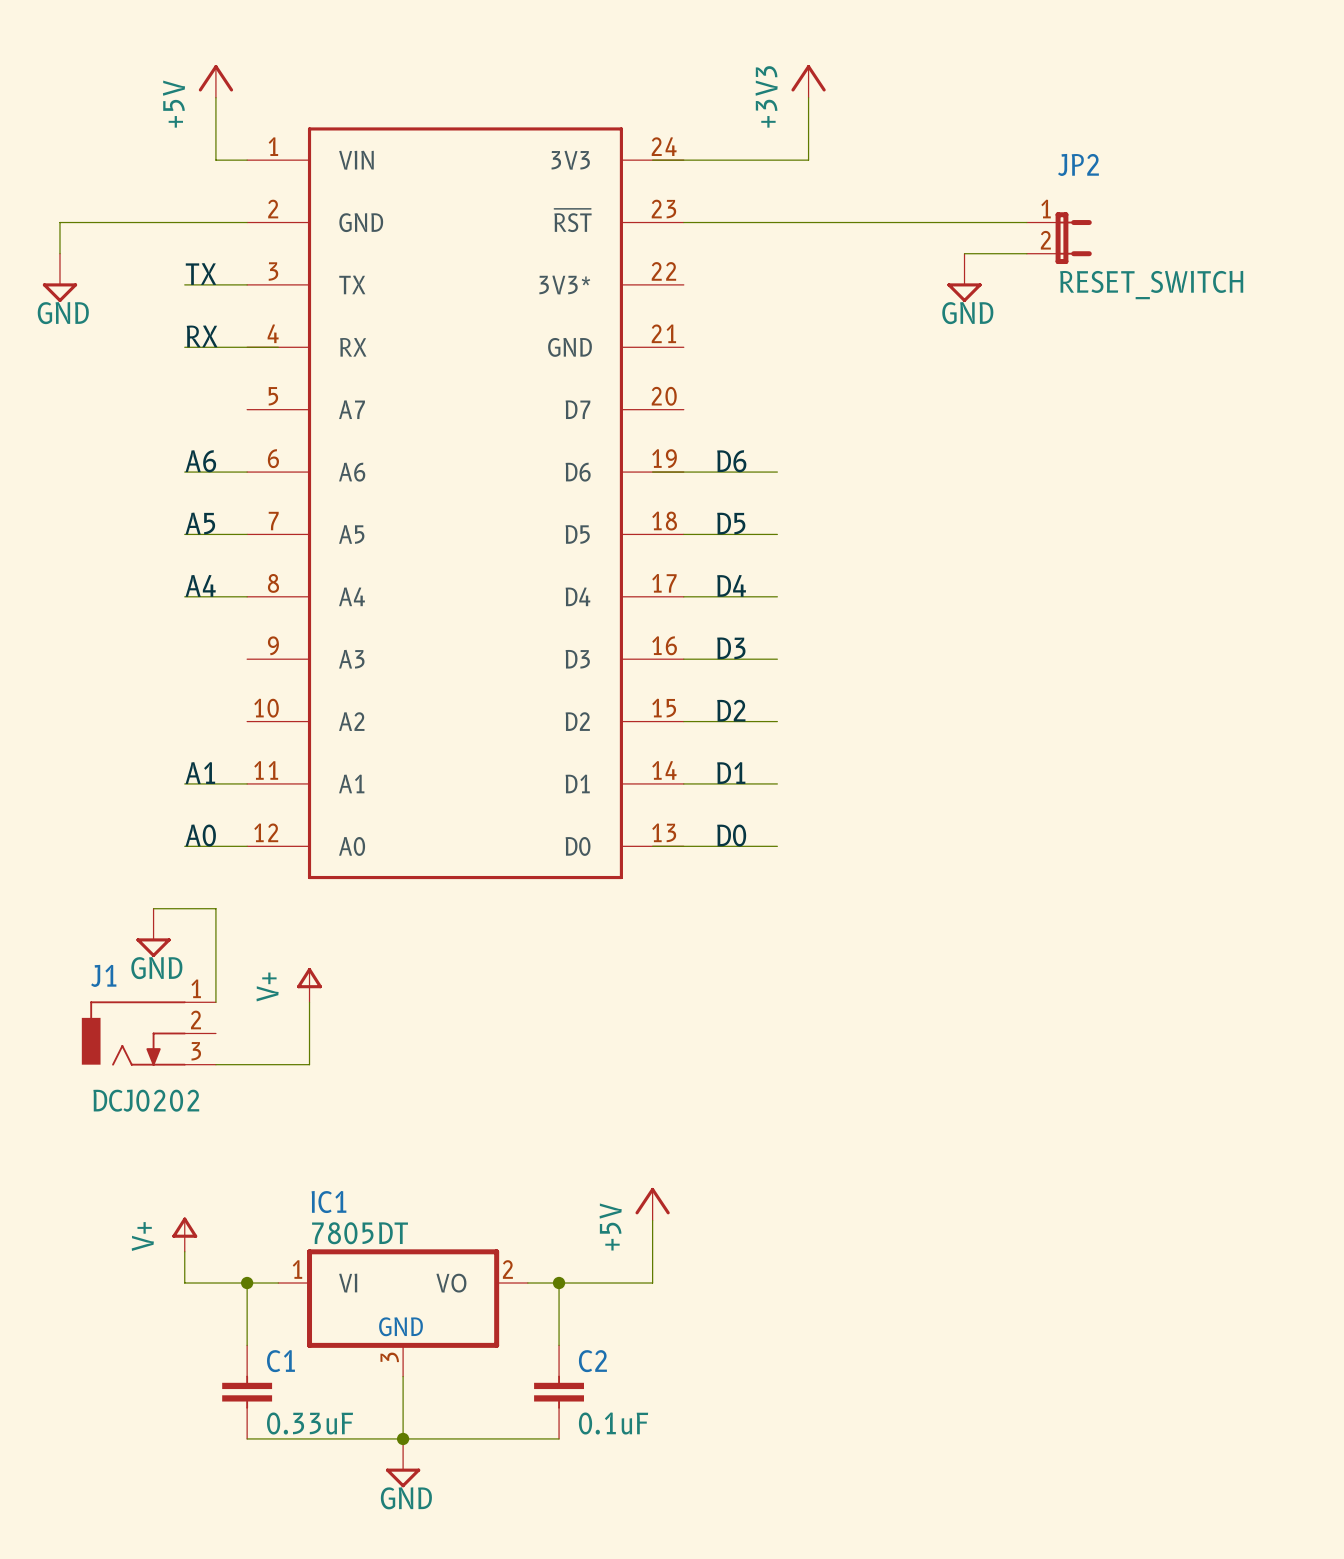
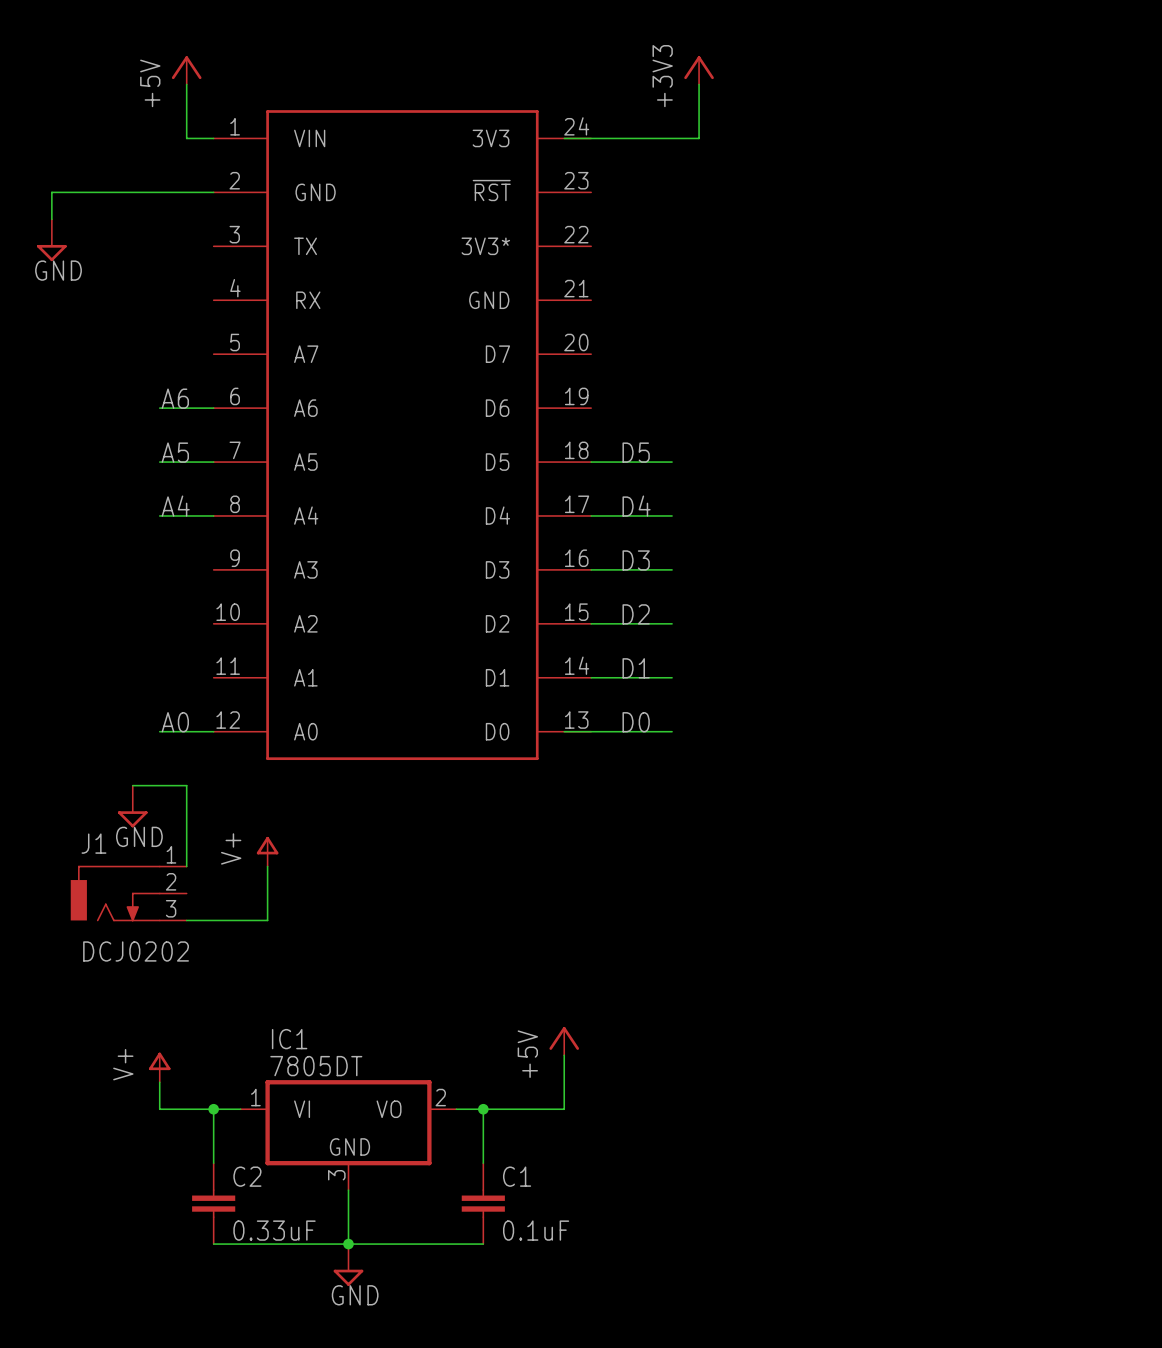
wire: (683, 222) (1026, 222) -> none
JP2: RESET_SWITCH (1059, 238) -> none
wire: (964, 253) (1026, 253) -> none
label: TX (201, 273) -> none
power symbol: GND (964, 277) -> none
wire: (184, 284) (247, 284) -> none
label: RX (202, 336) -> none
wire: (184, 347) (278, 347) -> none
label: D6 (731, 461) -> none
wire: (652, 472) (777, 472) -> none
label: A1 (200, 773) -> none
wire: (184, 783) (247, 783) -> none
C1 name: C1 (280, 1361) -> C2 (247, 1176)
C2 name: C2 (592, 1361) -> C1 (517, 1176)

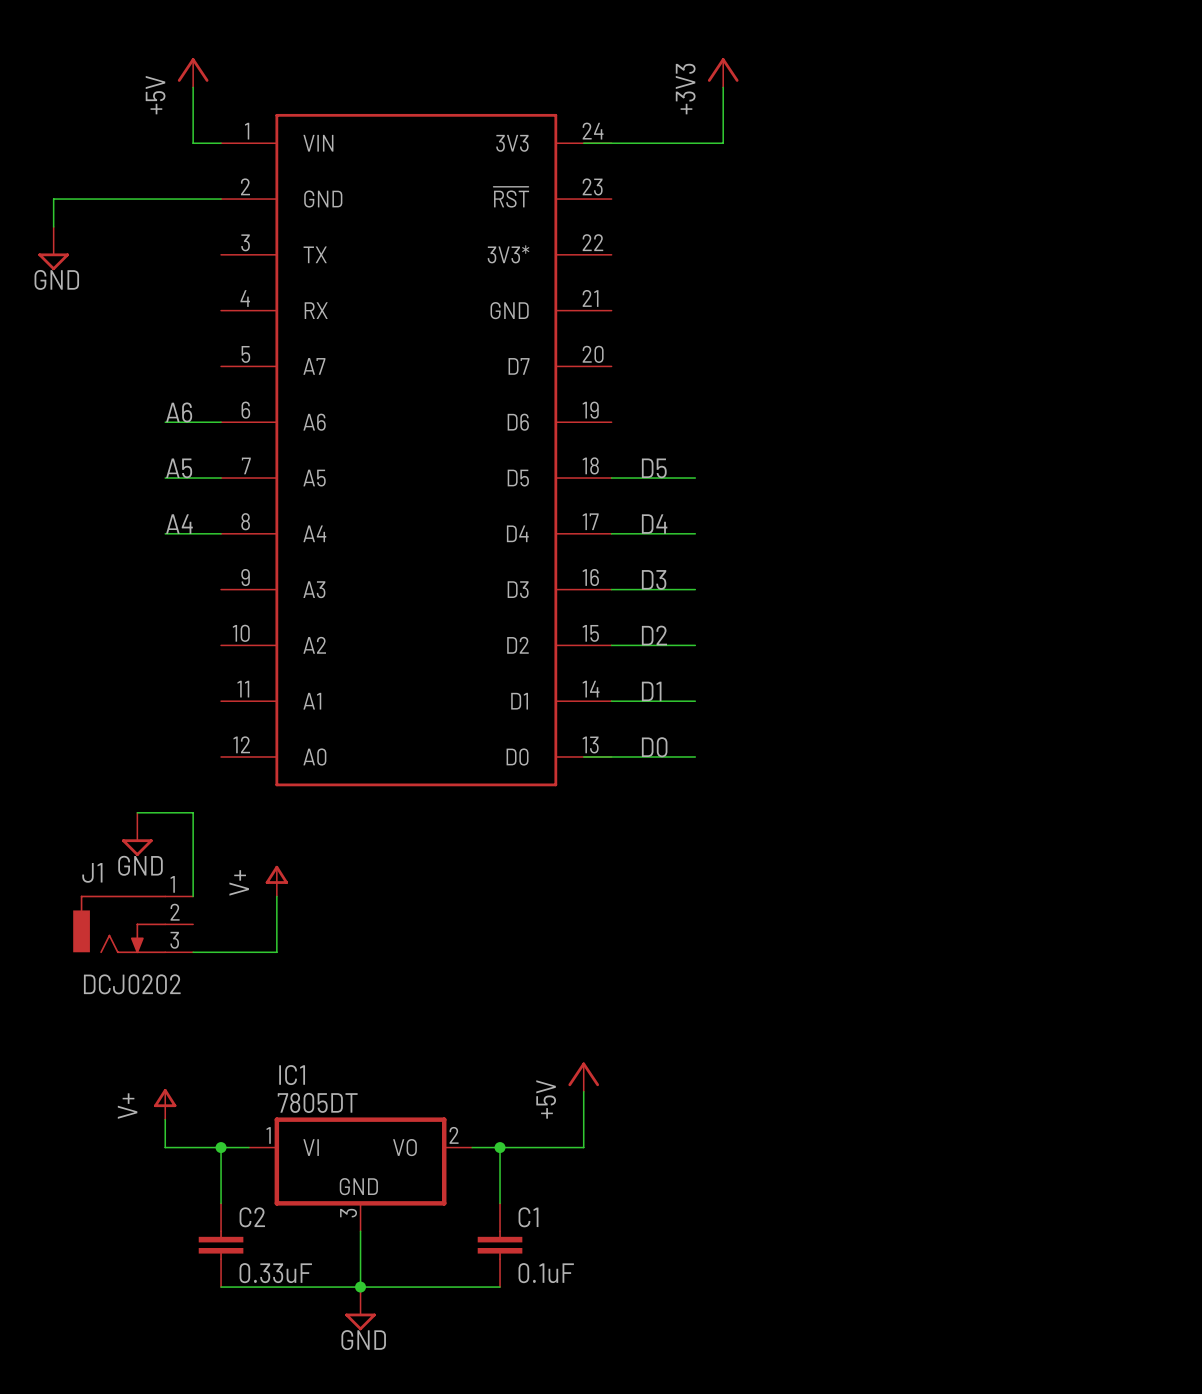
label: A0 (175, 722) -> none
wire: (159, 731) (213, 731) -> none

